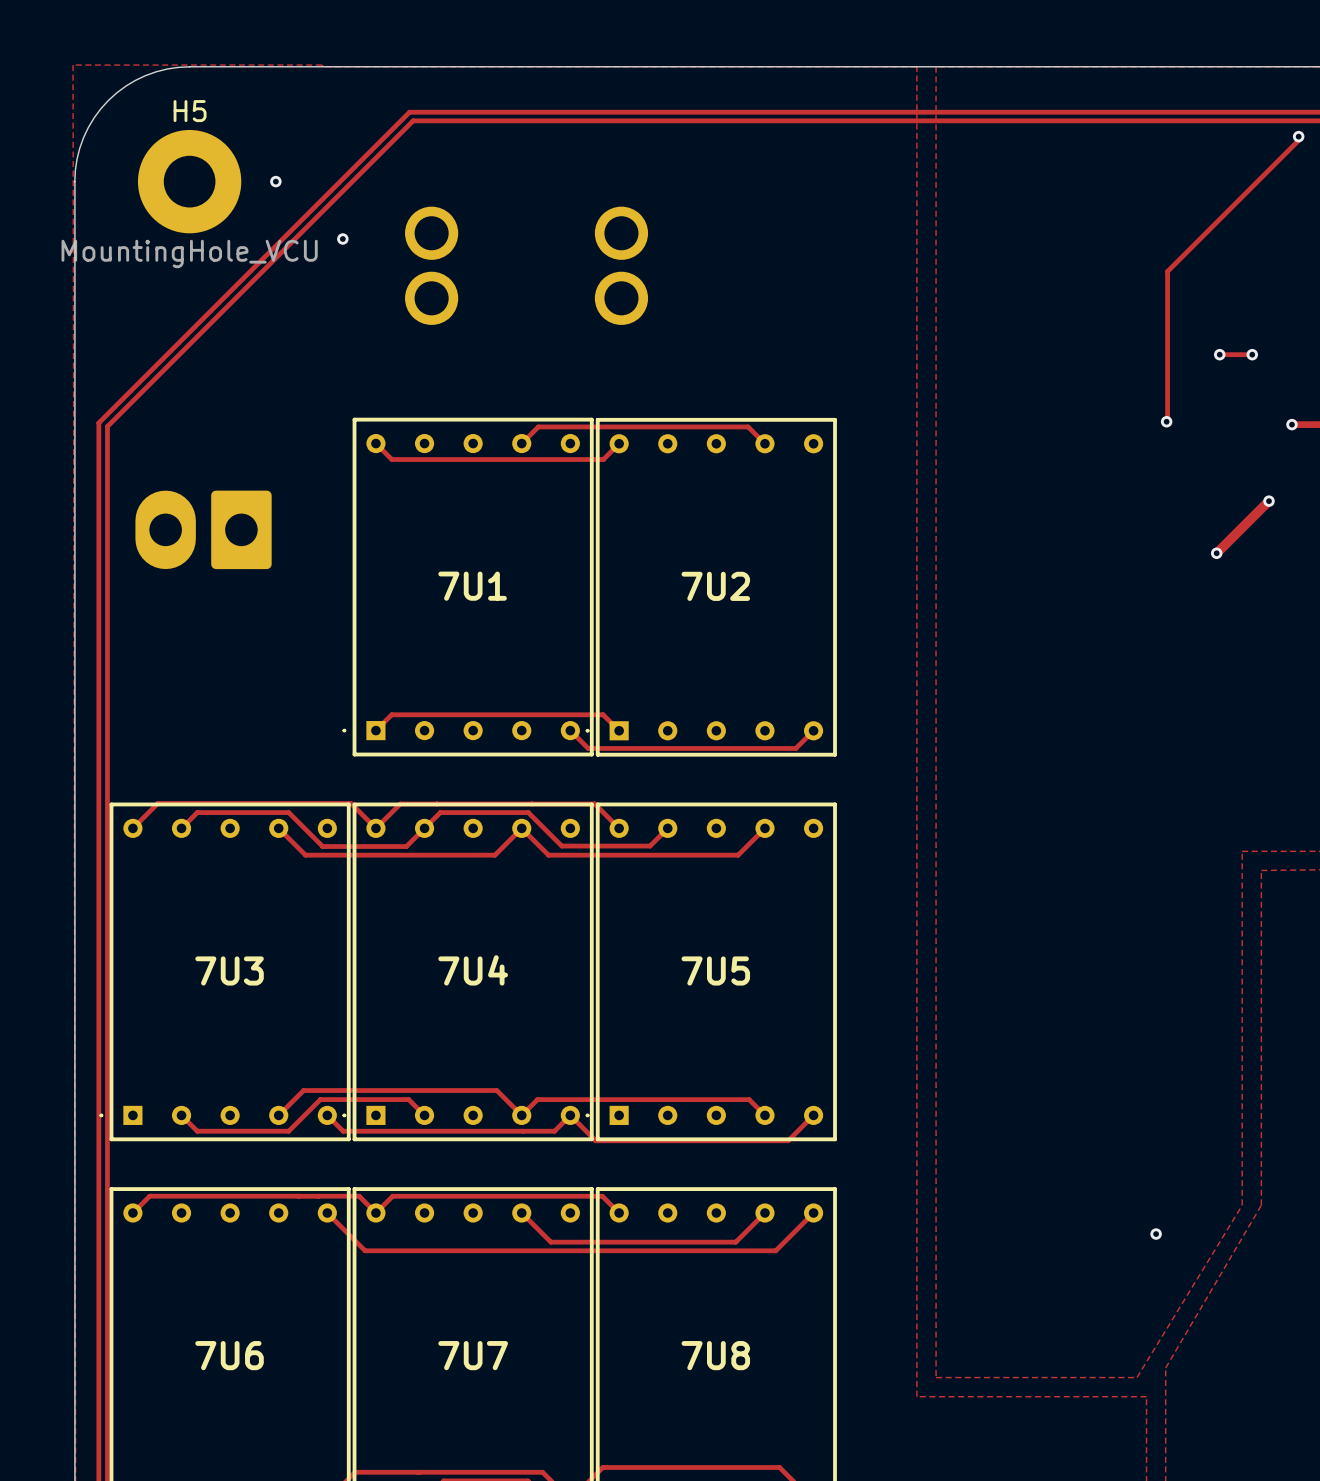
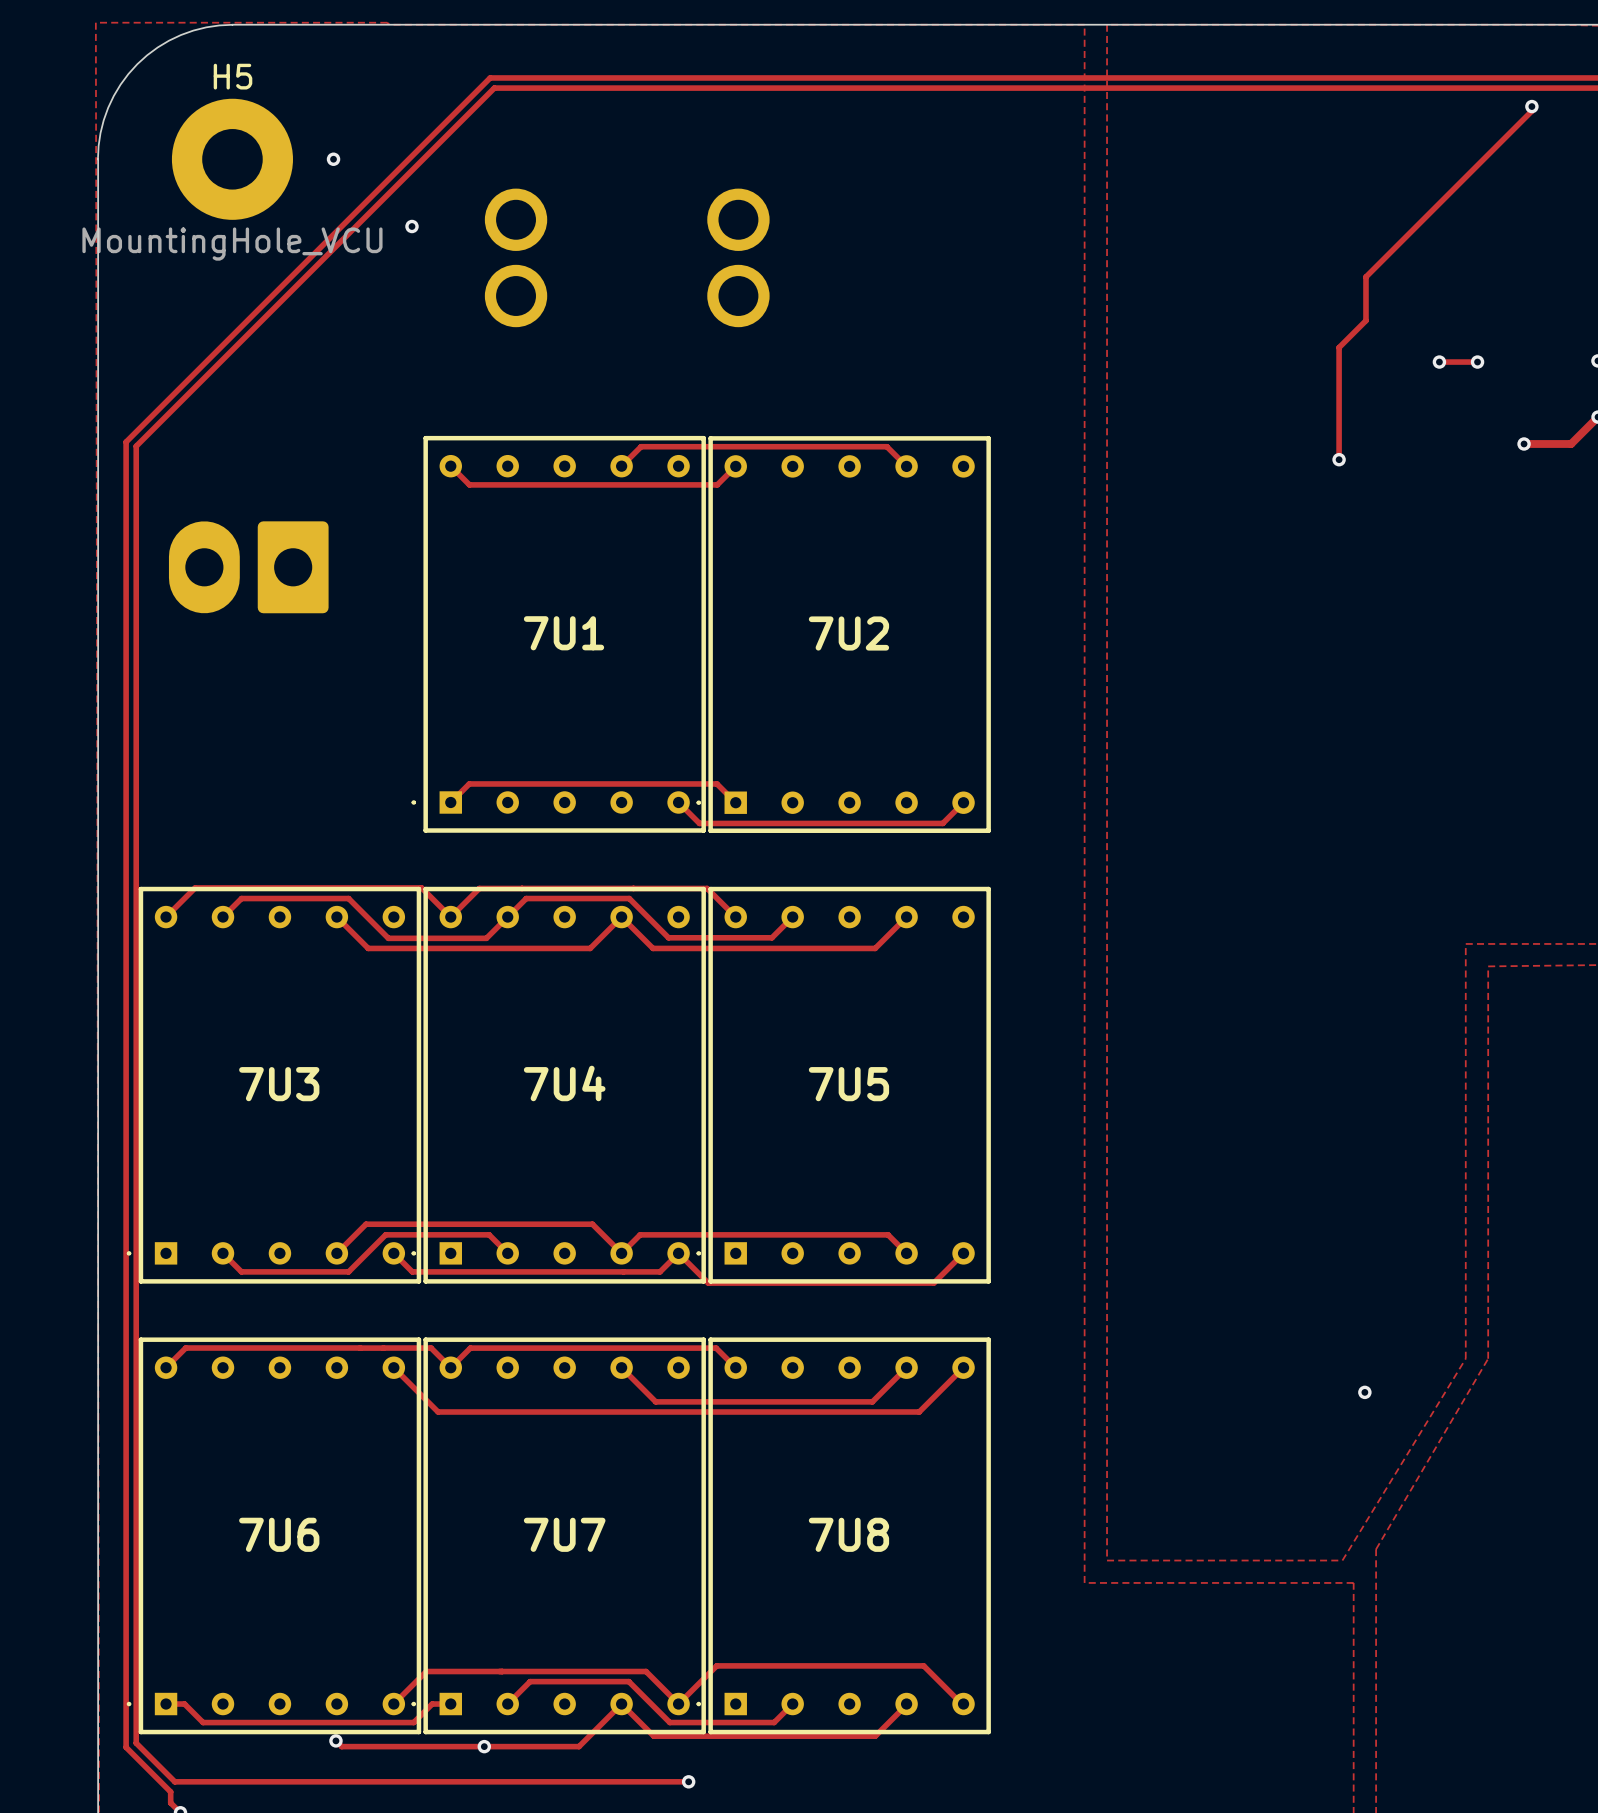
track: (1167, 271) (1166, 421) -> (1378, 264) (1365, 276) (1365, 320) (1339, 347) (1339, 459)
via position: (1166, 421) -> (1339, 459)
track: (1268, 501) (1216, 553) -> none
via: (1269, 501) -> none
via: (1216, 553) -> none

